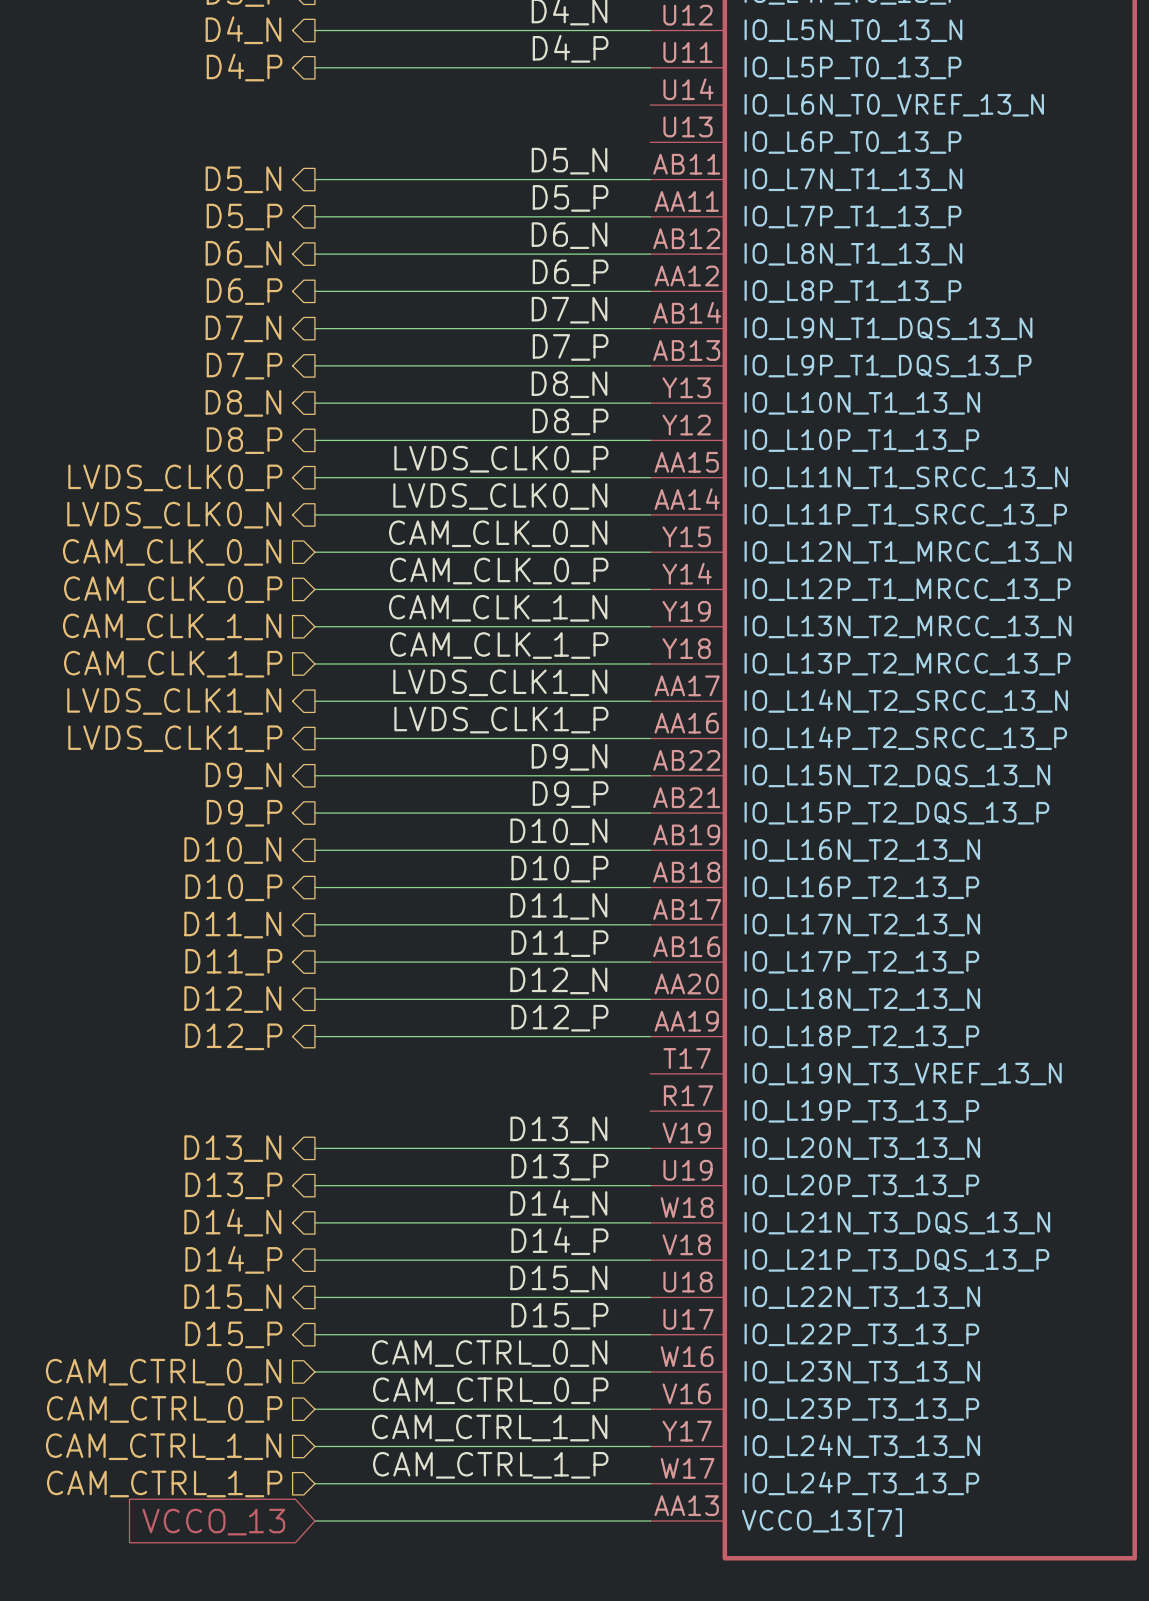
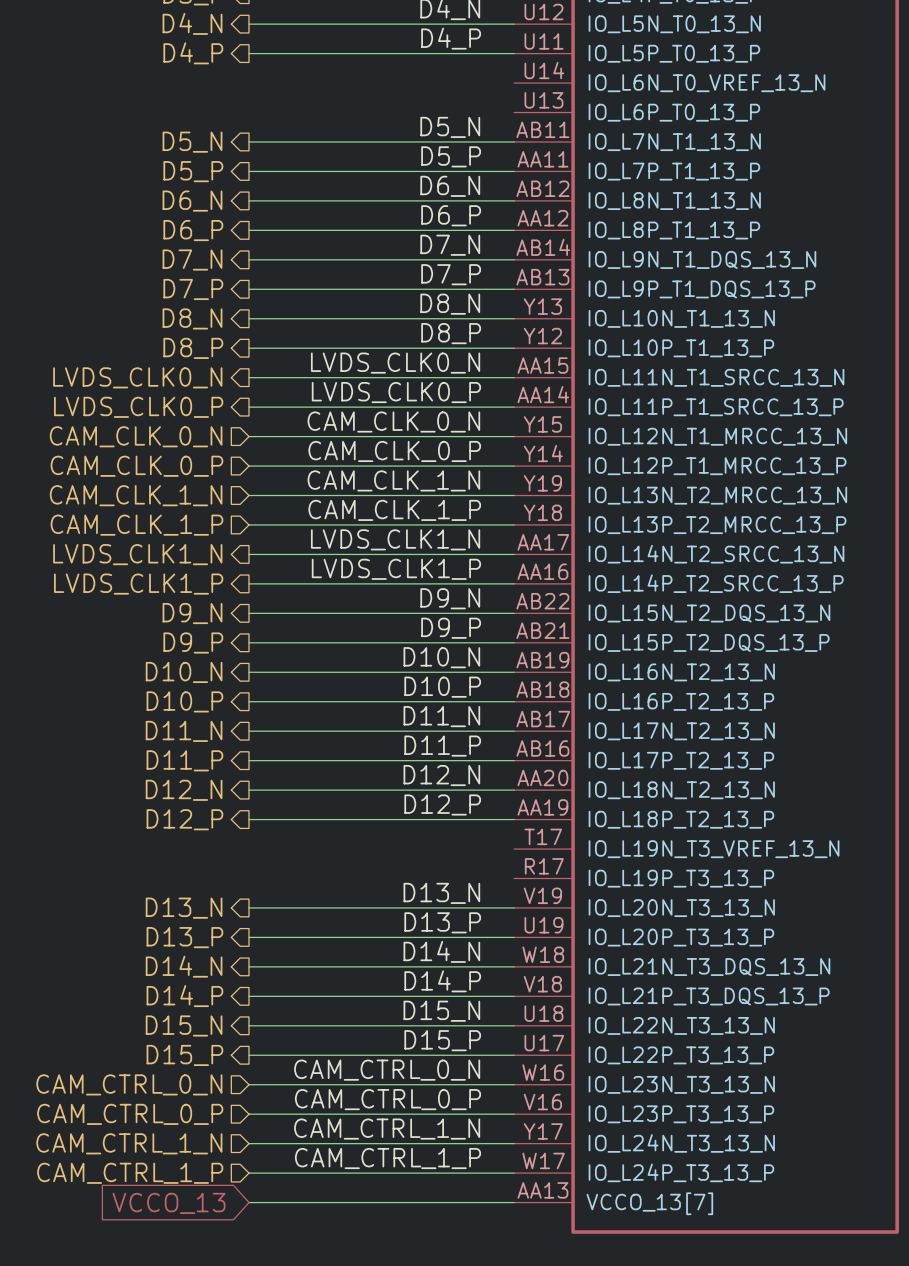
label: LVDS_CLK0_P (501, 459) -> LVDS_CLK0_N (395, 363)
hierarchical label: LVDS_CLK0_P (175, 477) -> LVDS_CLK0_N (137, 377)
label: LVDS_CLK0_N (500, 496) -> LVDS_CLK0_P (396, 392)
hierarchical label: LVDS_CLK0_N (174, 515) -> LVDS_CLK0_P (138, 407)

